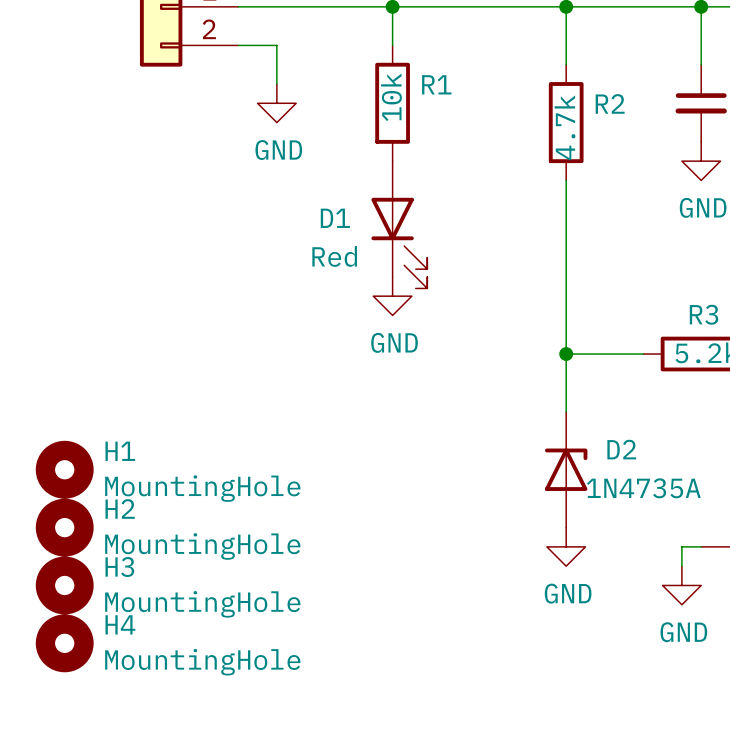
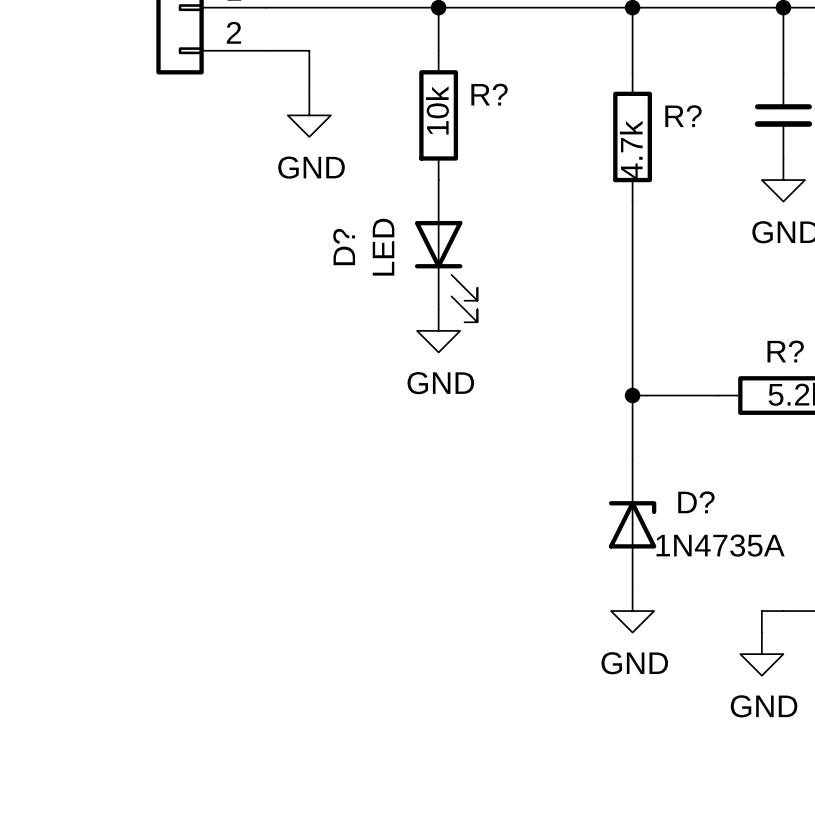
R1 name: R1 (436, 84) -> R? (489, 94)
R2 name: R2 (610, 103) -> R? (683, 116)
D1 name: D1 (335, 218) -> D? (344, 247)
D1 value: Red (334, 256) -> LED (383, 247)
R3 name: R3 (704, 314) -> R? (785, 351)
D2 name: D2 (621, 449) -> D? (696, 502)
H1: MountingHole (64, 469) -> none
H2: MountingHole (64, 527) -> none
H3: MountingHole (64, 585) -> none
H4: MountingHole (64, 643) -> none

